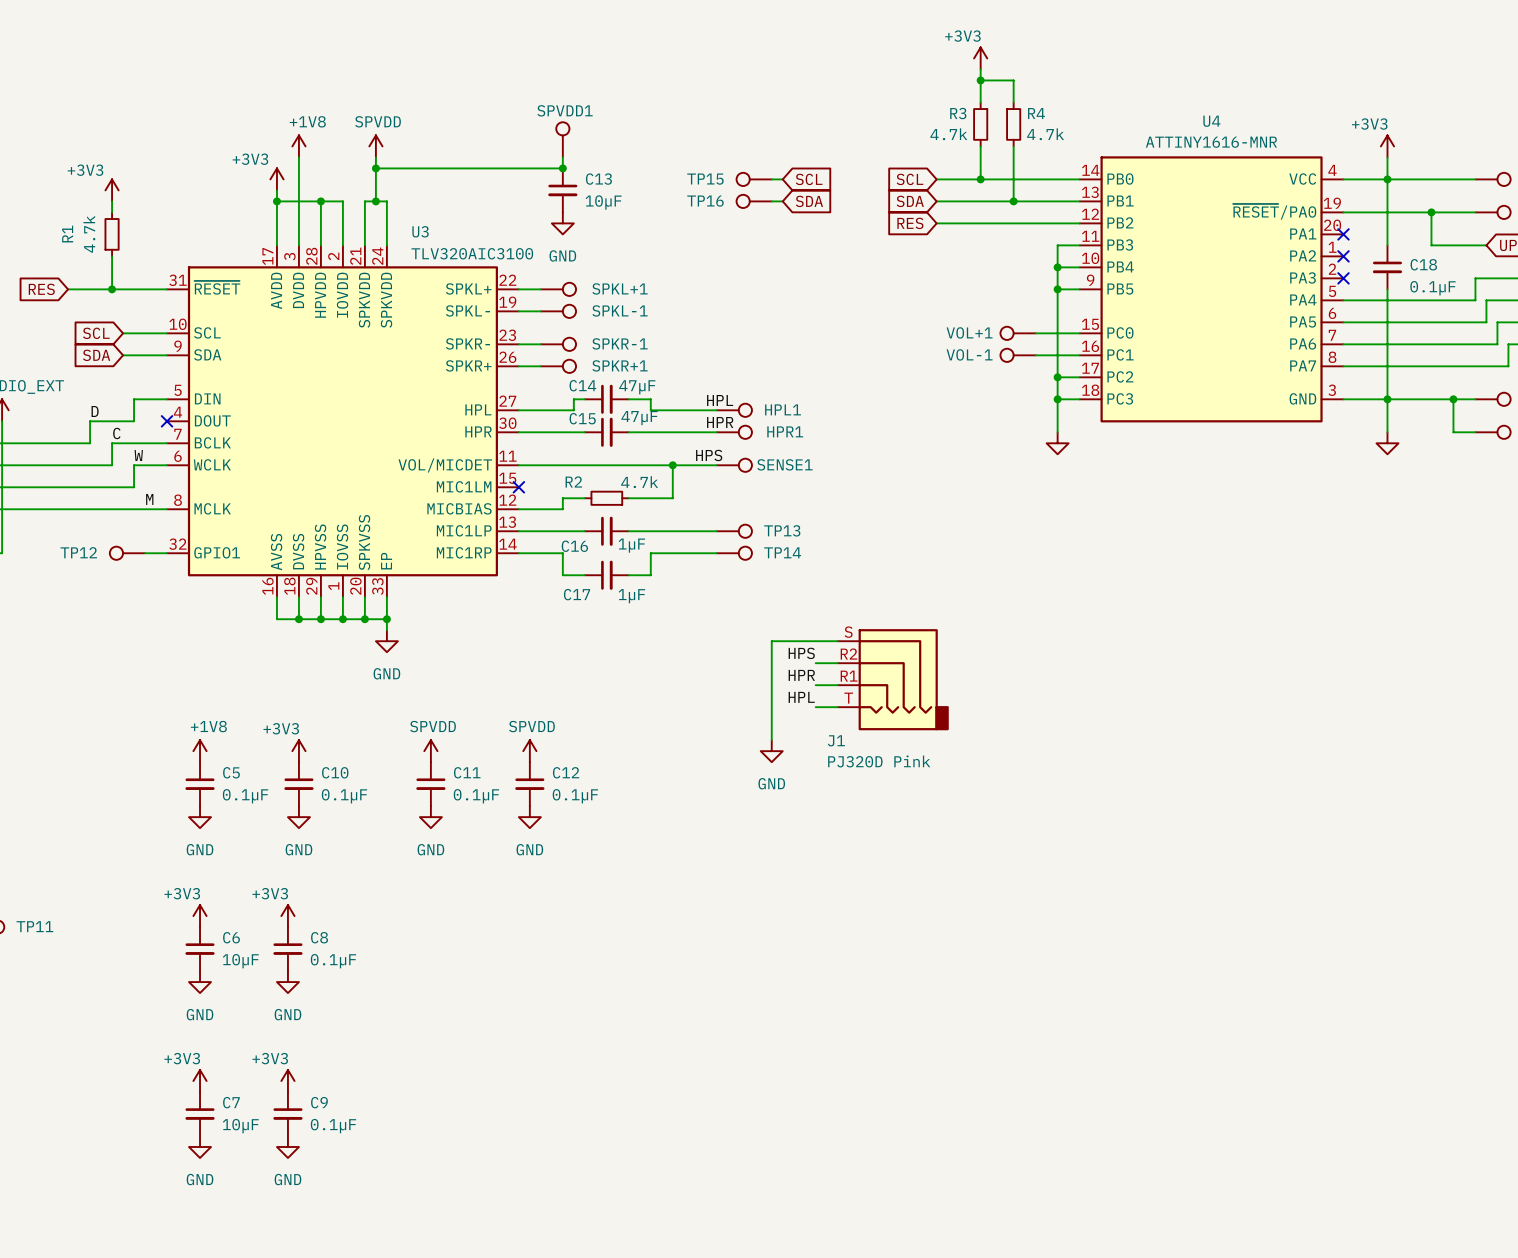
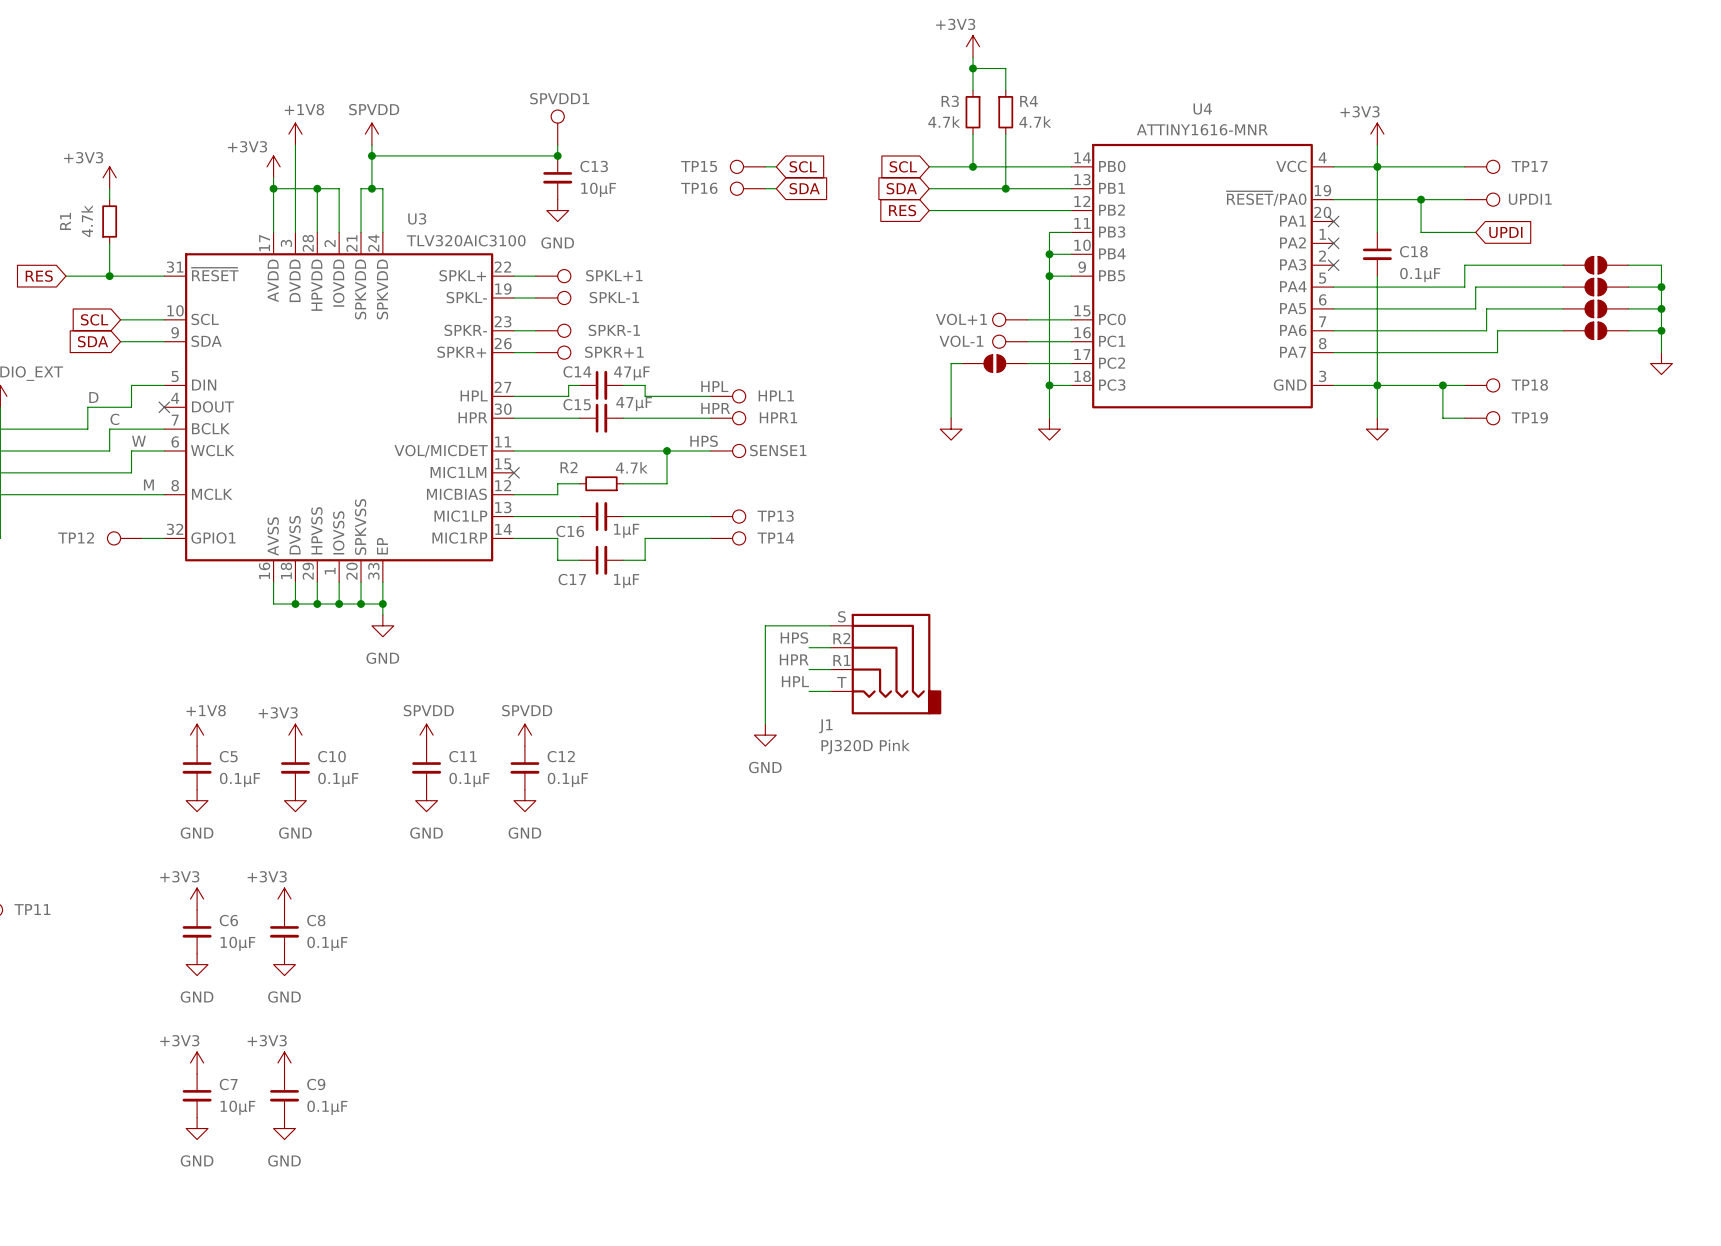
wire: none -> (962, 363) (951, 363) (951, 418)
part: none -> (994, 363)
wire: none -> (1027, 363) (1049, 363)
junction: (1057, 377) -> none
power symbol: none -> (951, 429)

